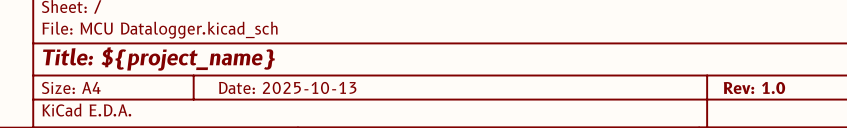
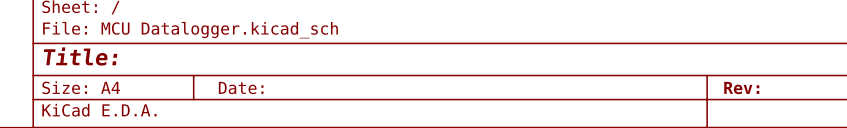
title block: Title: ${project_name} (158, 58) -> Title: (80, 56)
title block: Date: 2025-10-13 (287, 87) -> Date: (241, 88)
title block: Rev: 1.0 (754, 87) -> Rev: (741, 88)

